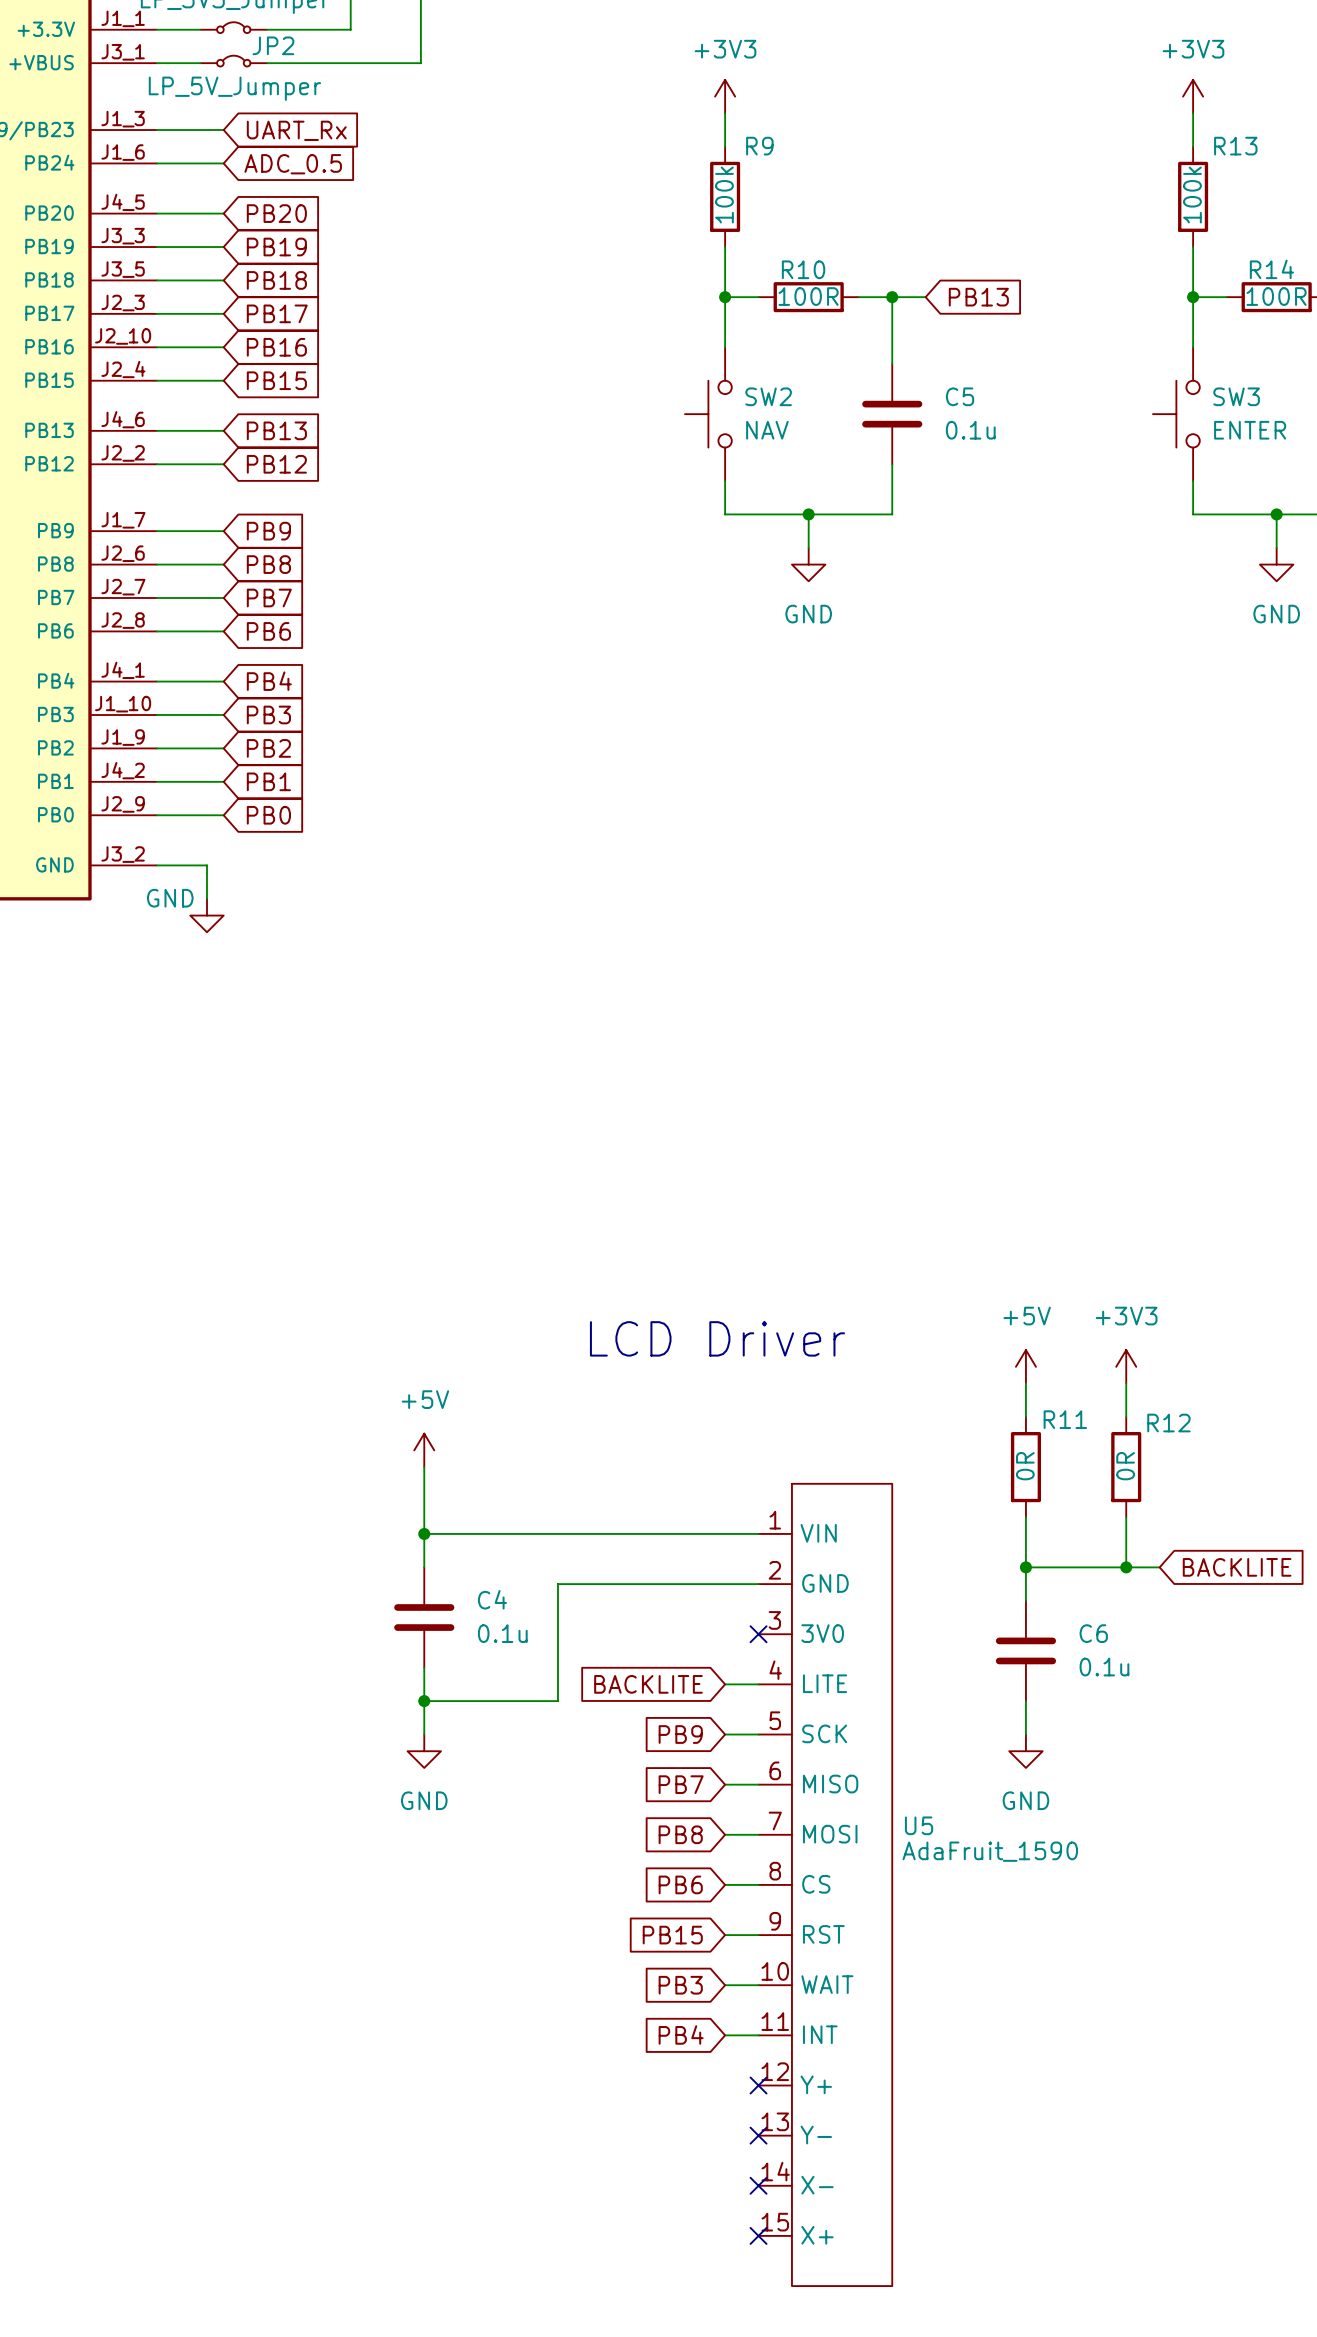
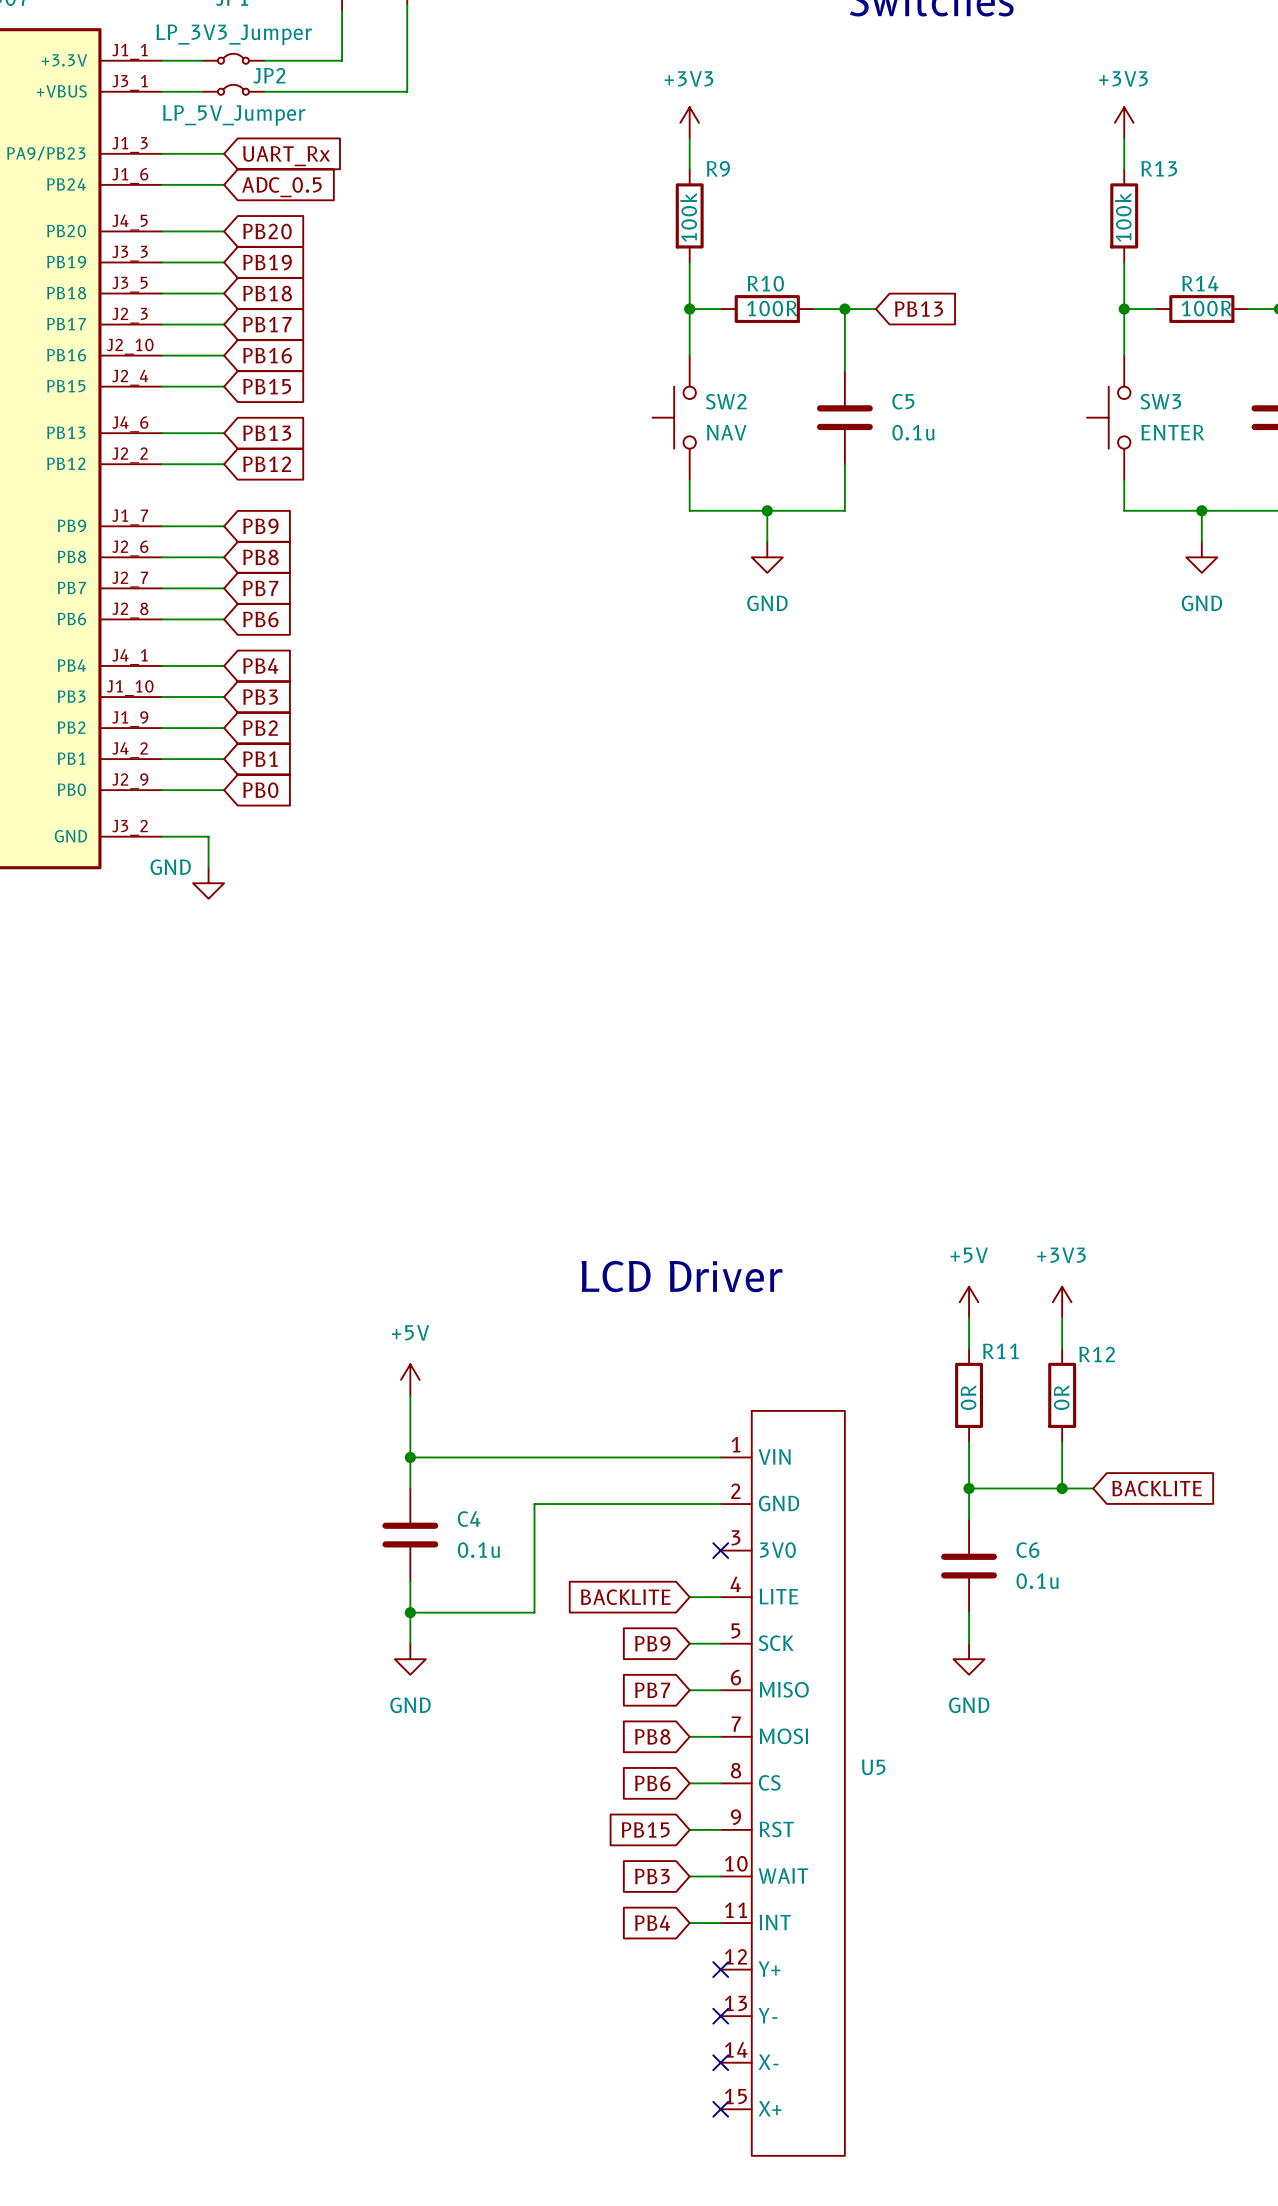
U5 name position: U5 (919, 1825) -> U5 (873, 1767)
U5 value: AdaFruit_1590 (990, 1851) -> none

